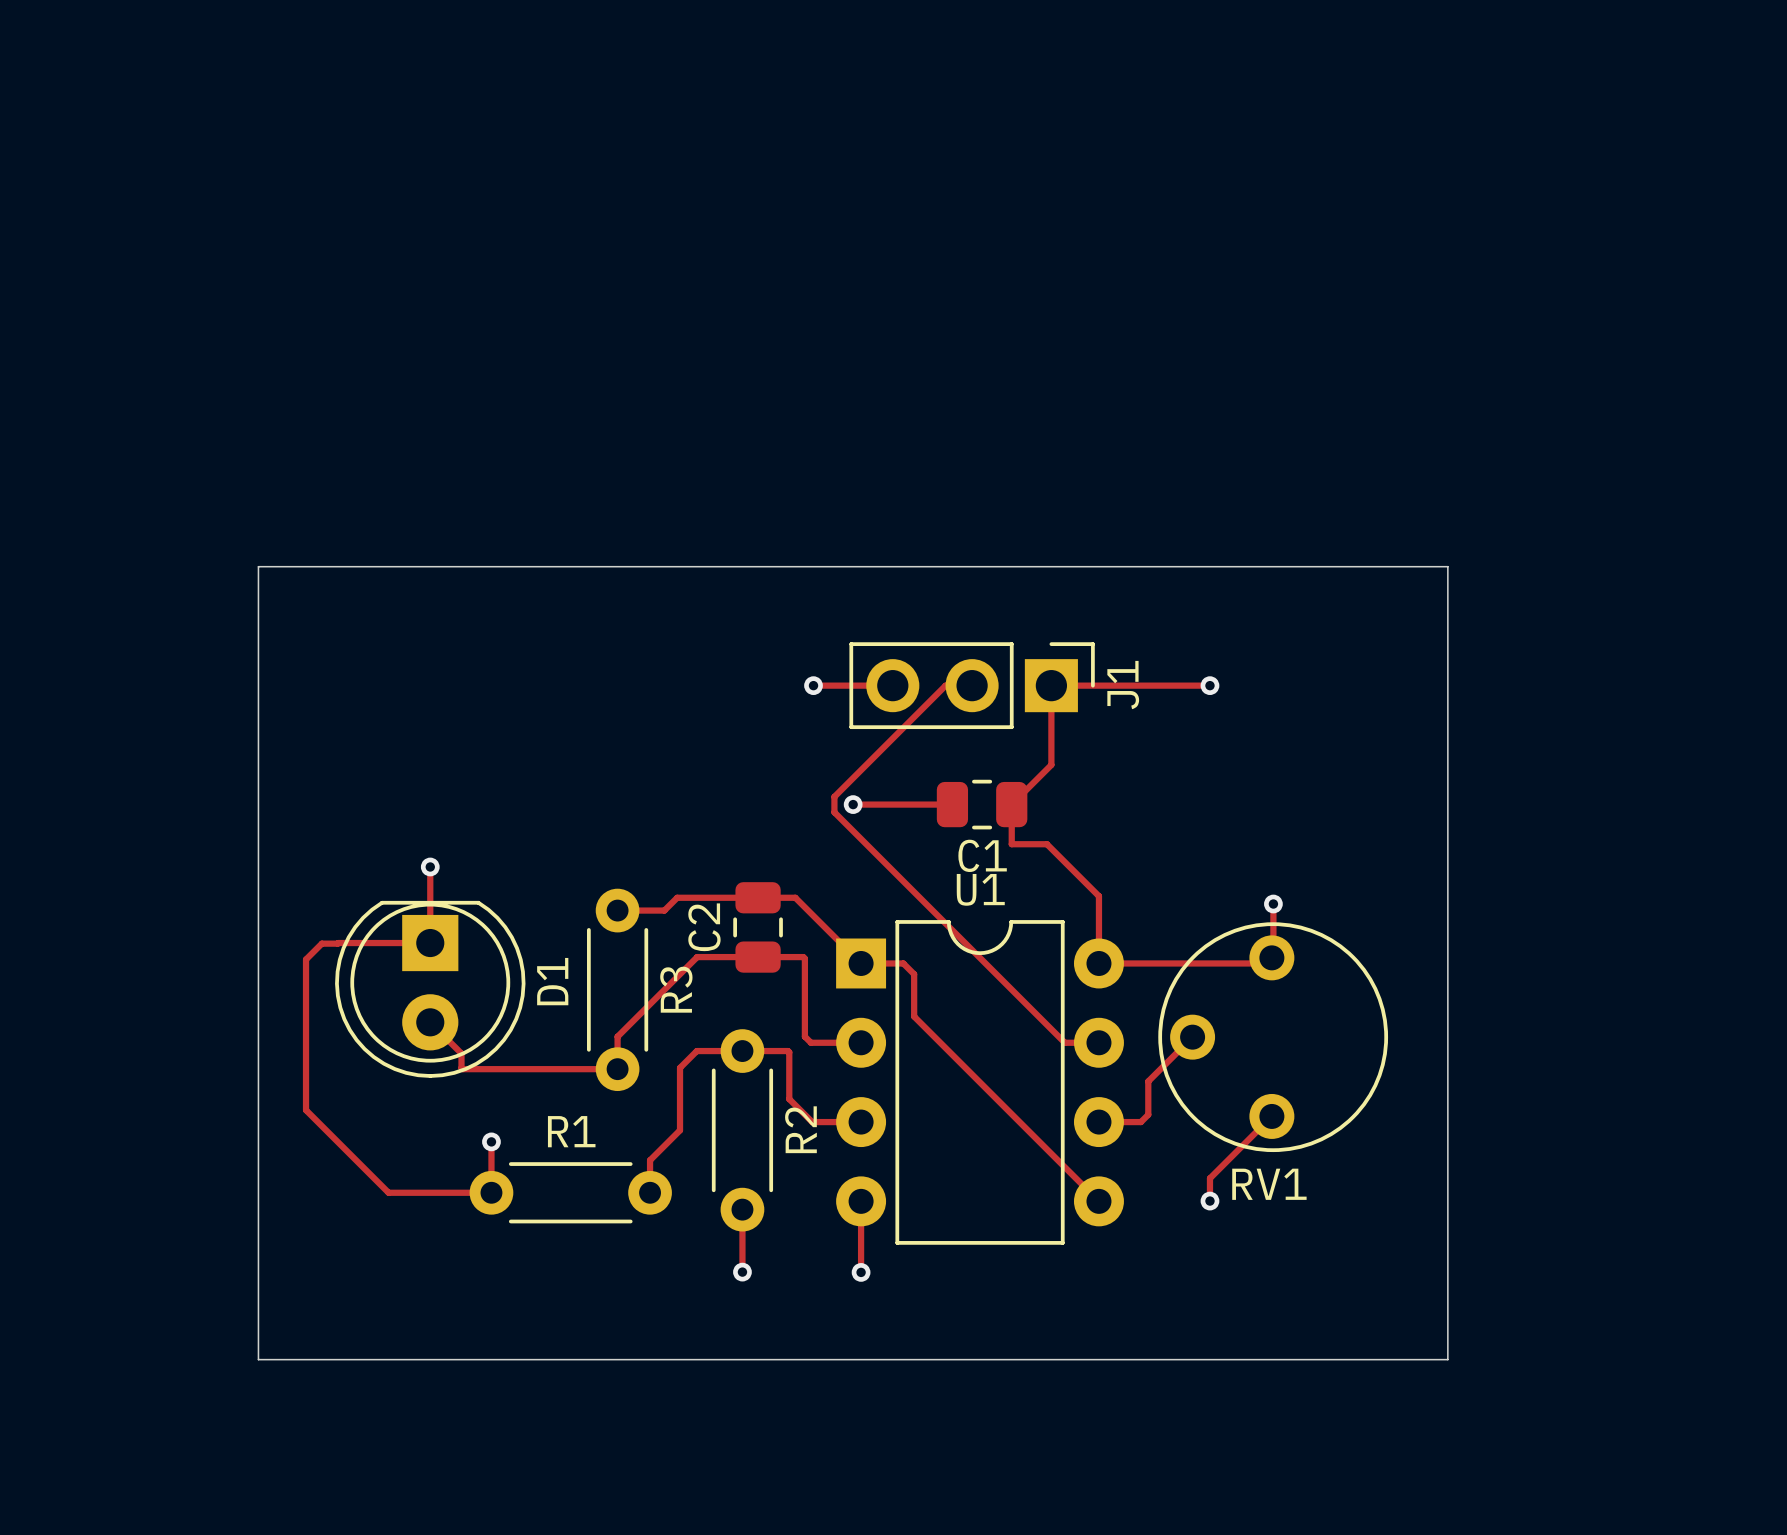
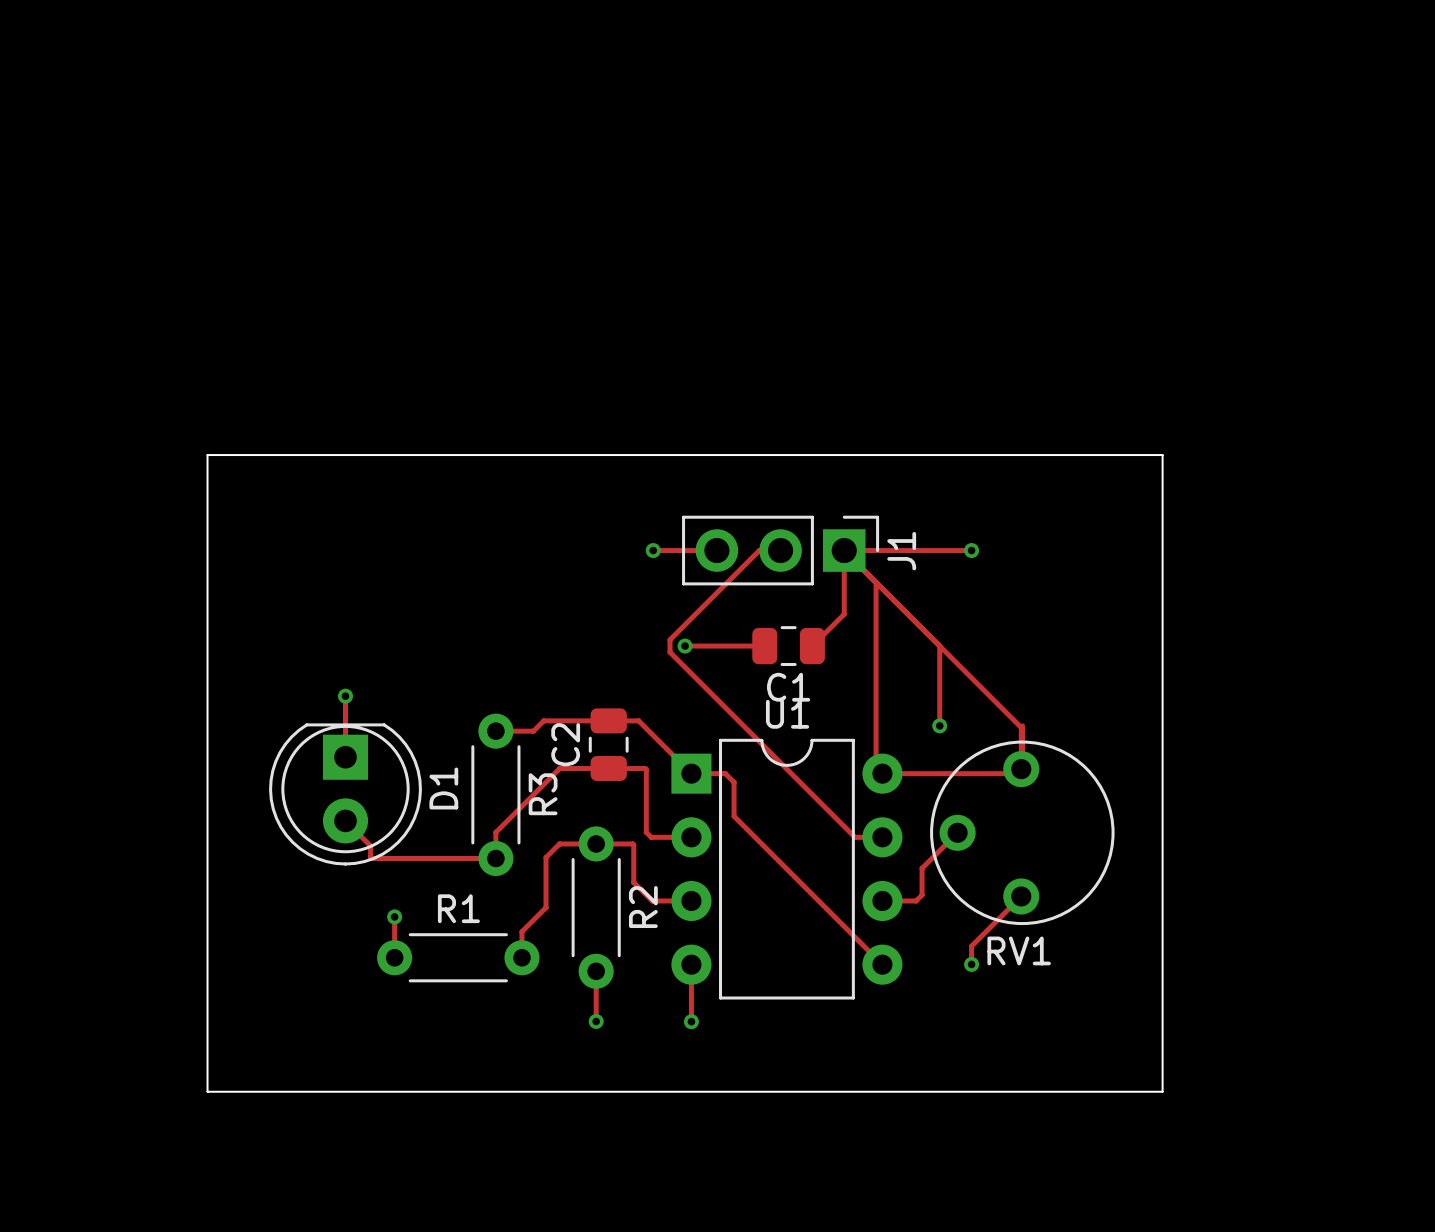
track: none -> (844, 550) (1021, 727) (1021, 769)
track: (1011, 804) (1011, 844) (1046, 844) (1098, 896) (1098, 963) -> (876, 582) (876, 767) (882, 773)
track: none -> (939, 646) (939, 725)
via position: (1273, 904) -> (939, 725)
track: (430, 943) (321, 943) (306, 959) (306, 1110) (388, 1192) (491, 1192) -> none

